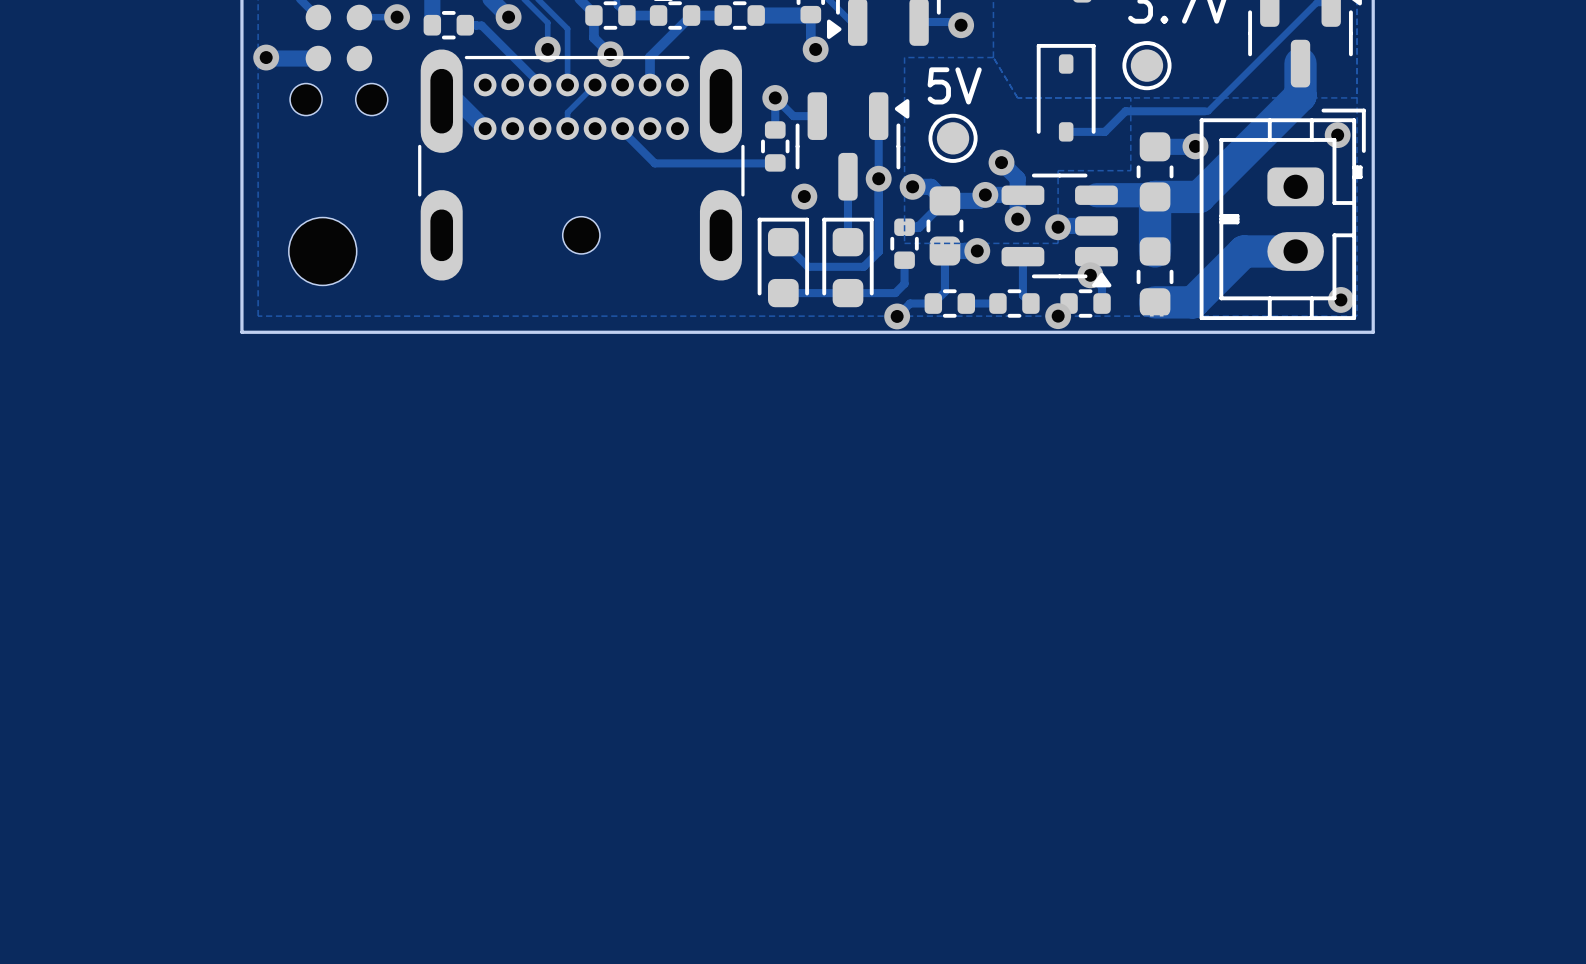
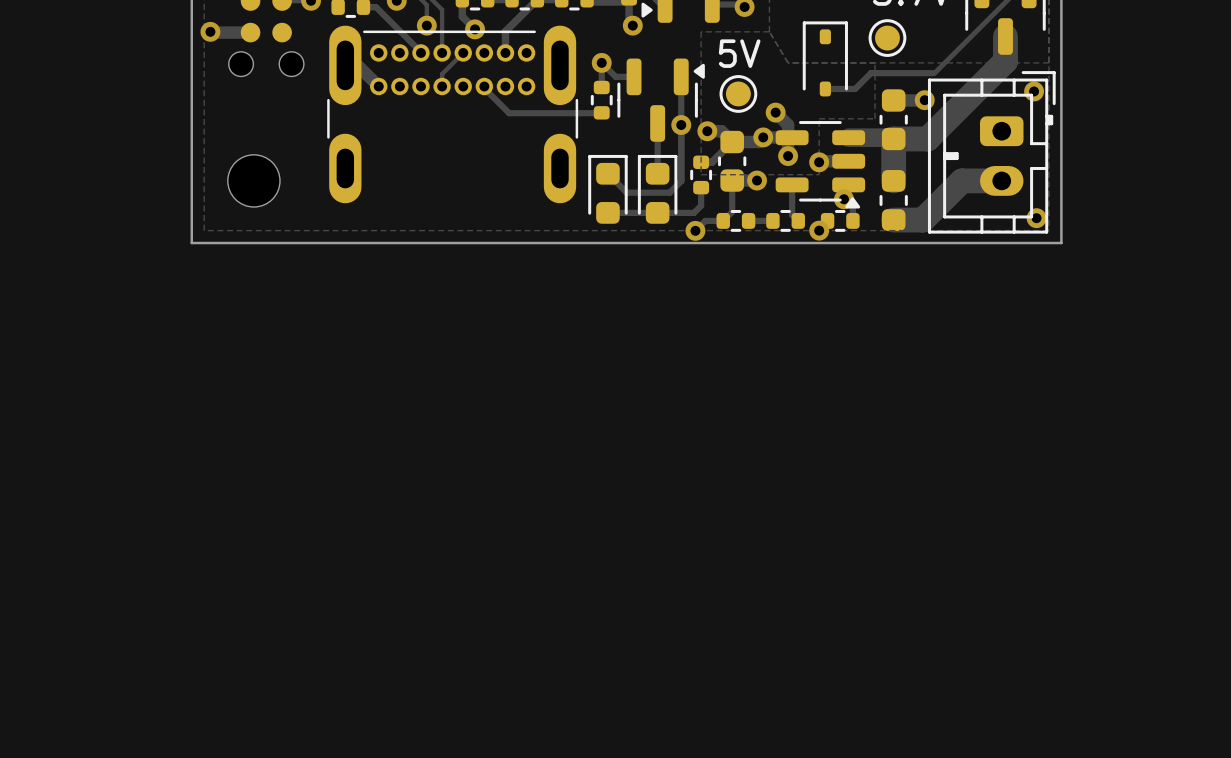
via: (804, 196) -> none
part: (581, 235) -> none

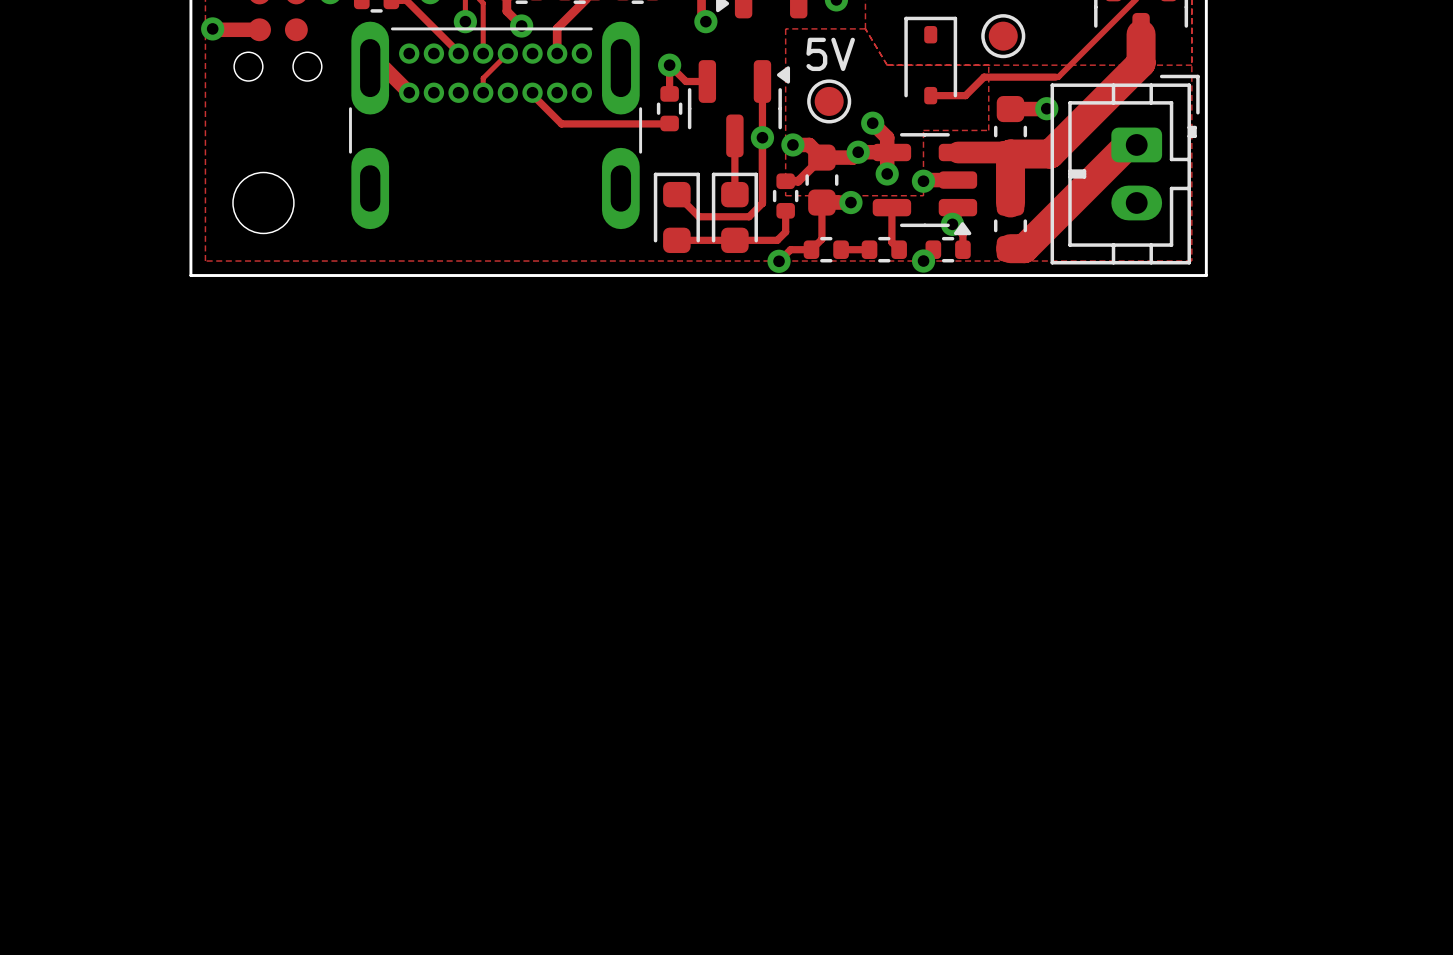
via: (1034, 91) -> none
track: (1001, 180) (962, 180) (922, 220) (905, 220) -> (1128, 144) (1024, 248)
via: (1036, 218) -> none

